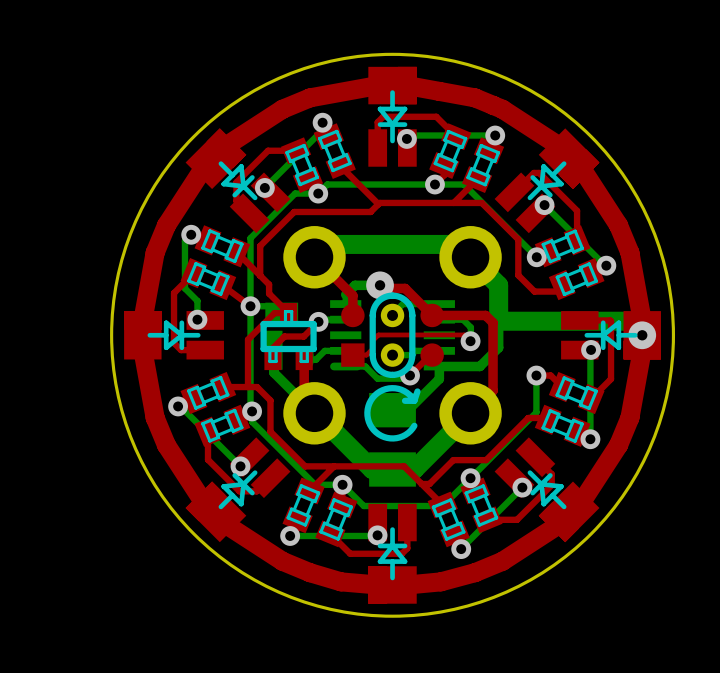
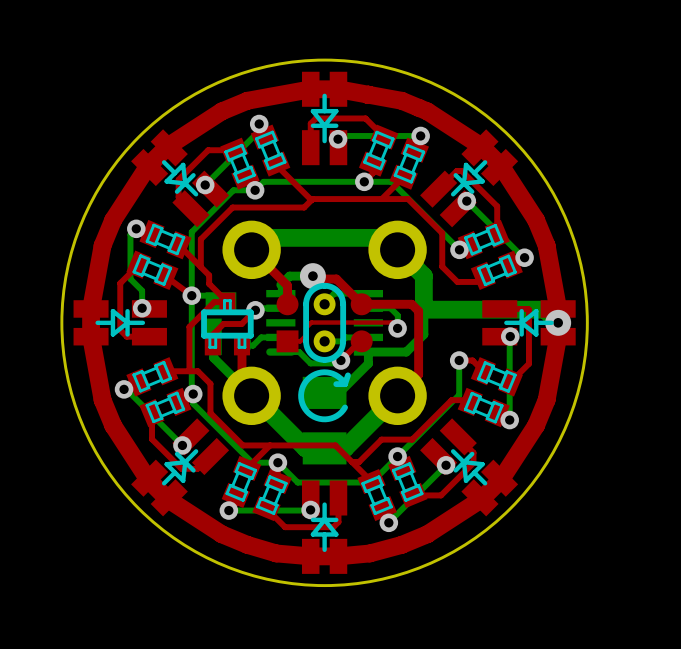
part footprint: [368, 66, 417, 167] -> [301, 71, 348, 166]
part footprint: [185, 128, 291, 234] -> [131, 129, 230, 228]
part footprint: [494, 128, 600, 234] -> [420, 129, 519, 228]
part footprint: [124, 311, 224, 360] -> [73, 300, 167, 346]
part footprint: [561, 311, 661, 360] -> [482, 300, 576, 346]
part footprint: [185, 437, 291, 543] -> [131, 418, 230, 517]
part footprint: [494, 437, 600, 543] -> [420, 418, 519, 517]
part footprint: [368, 503, 417, 604] -> [301, 480, 348, 574]

